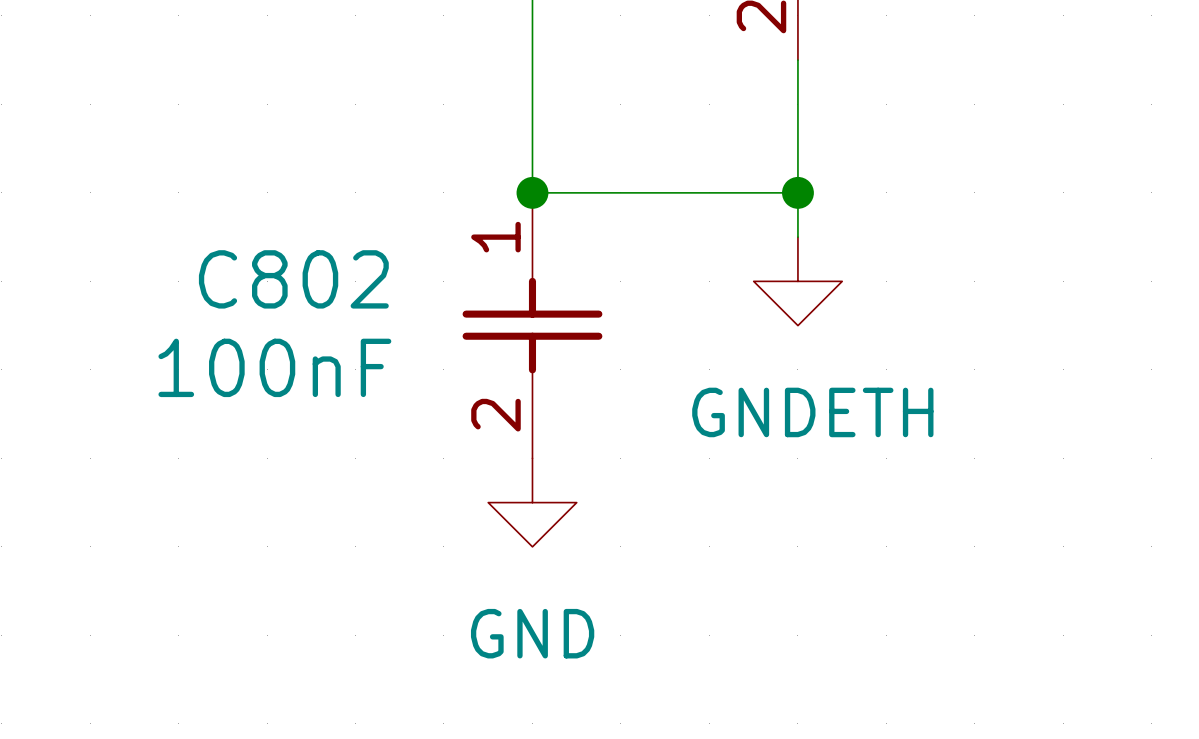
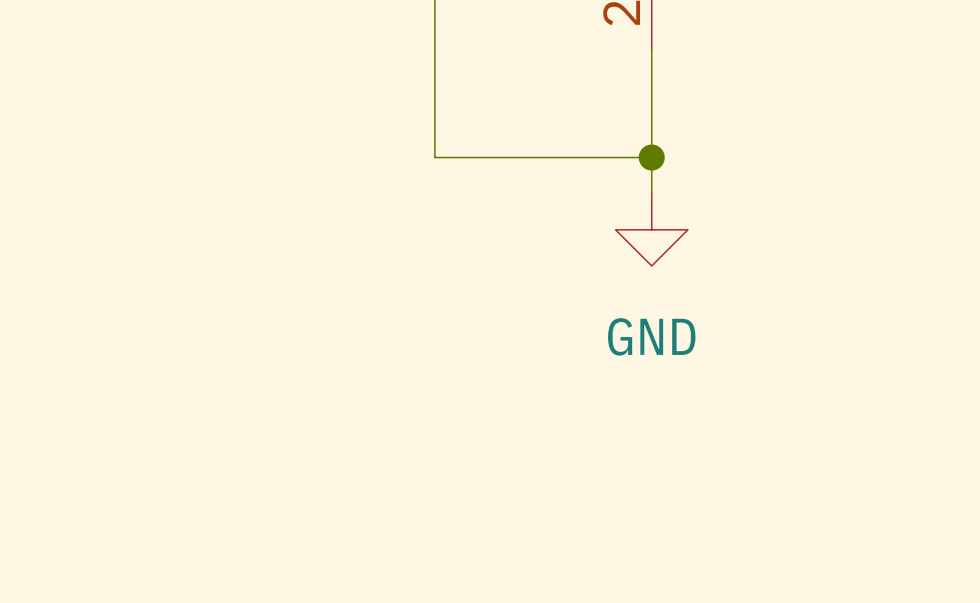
junction: (532, 192) -> none
power symbol: GNDETH (797, 281) -> GND (651, 229)
C802: 100nF (532, 325) -> none
power symbol: GND (532, 502) -> none

